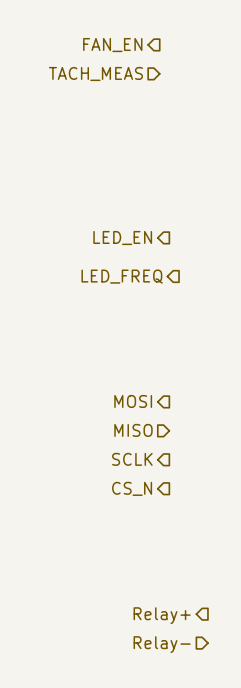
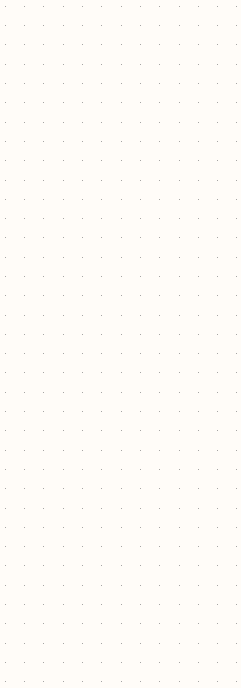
hierarchical label: FAN_EN (112, 45) -> none
hierarchical label: TACH_MEAS (95, 73) -> none
hierarchical label: LED_EN (122, 238) -> none
hierarchical label: LED_FREQ (122, 276) -> none
hierarchical label: MOSI (133, 401) -> none
hierarchical label: MISO (133, 430) -> none
hierarchical label: SCLK (132, 459) -> none
hierarchical label: CS_N (132, 488) -> none
hierarchical label: Relay+ (162, 615) -> none
hierarchical label: Relay- (162, 644) -> none

